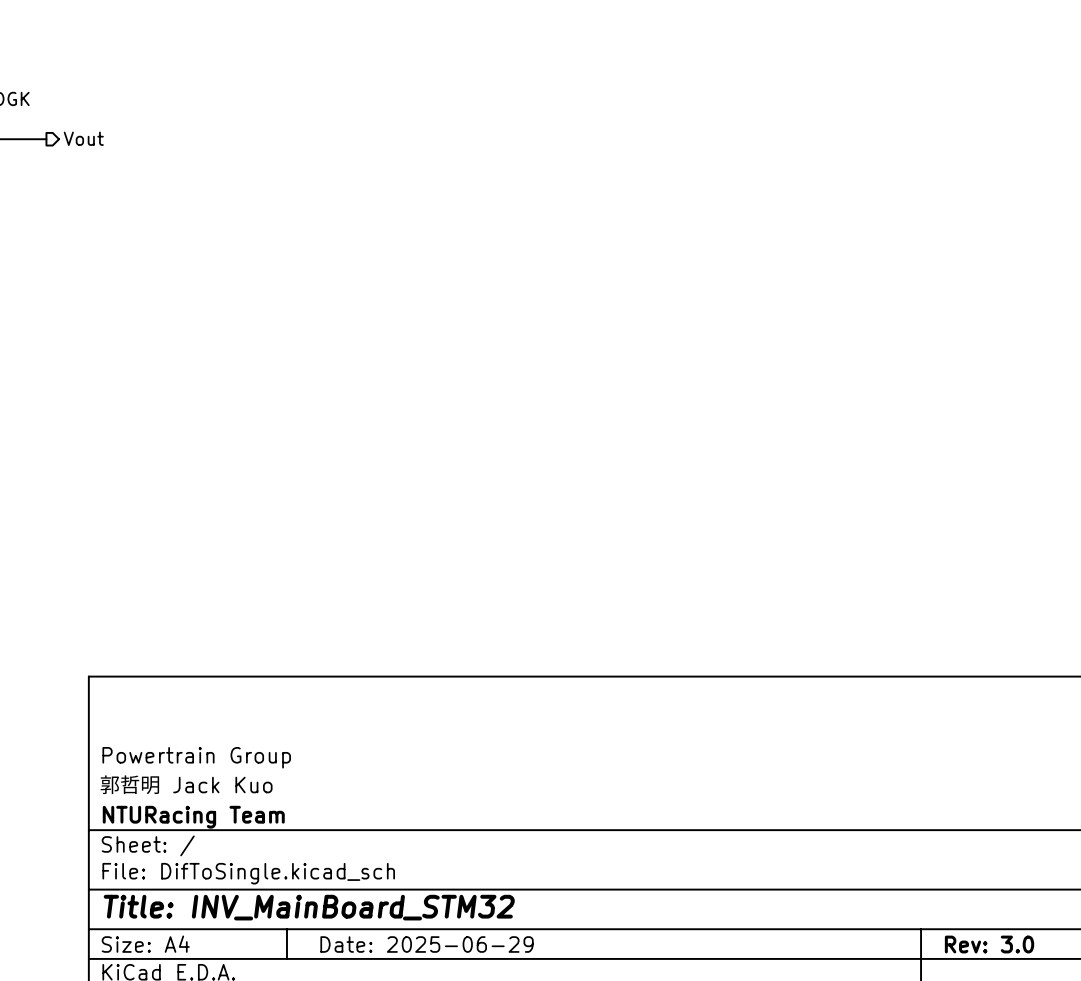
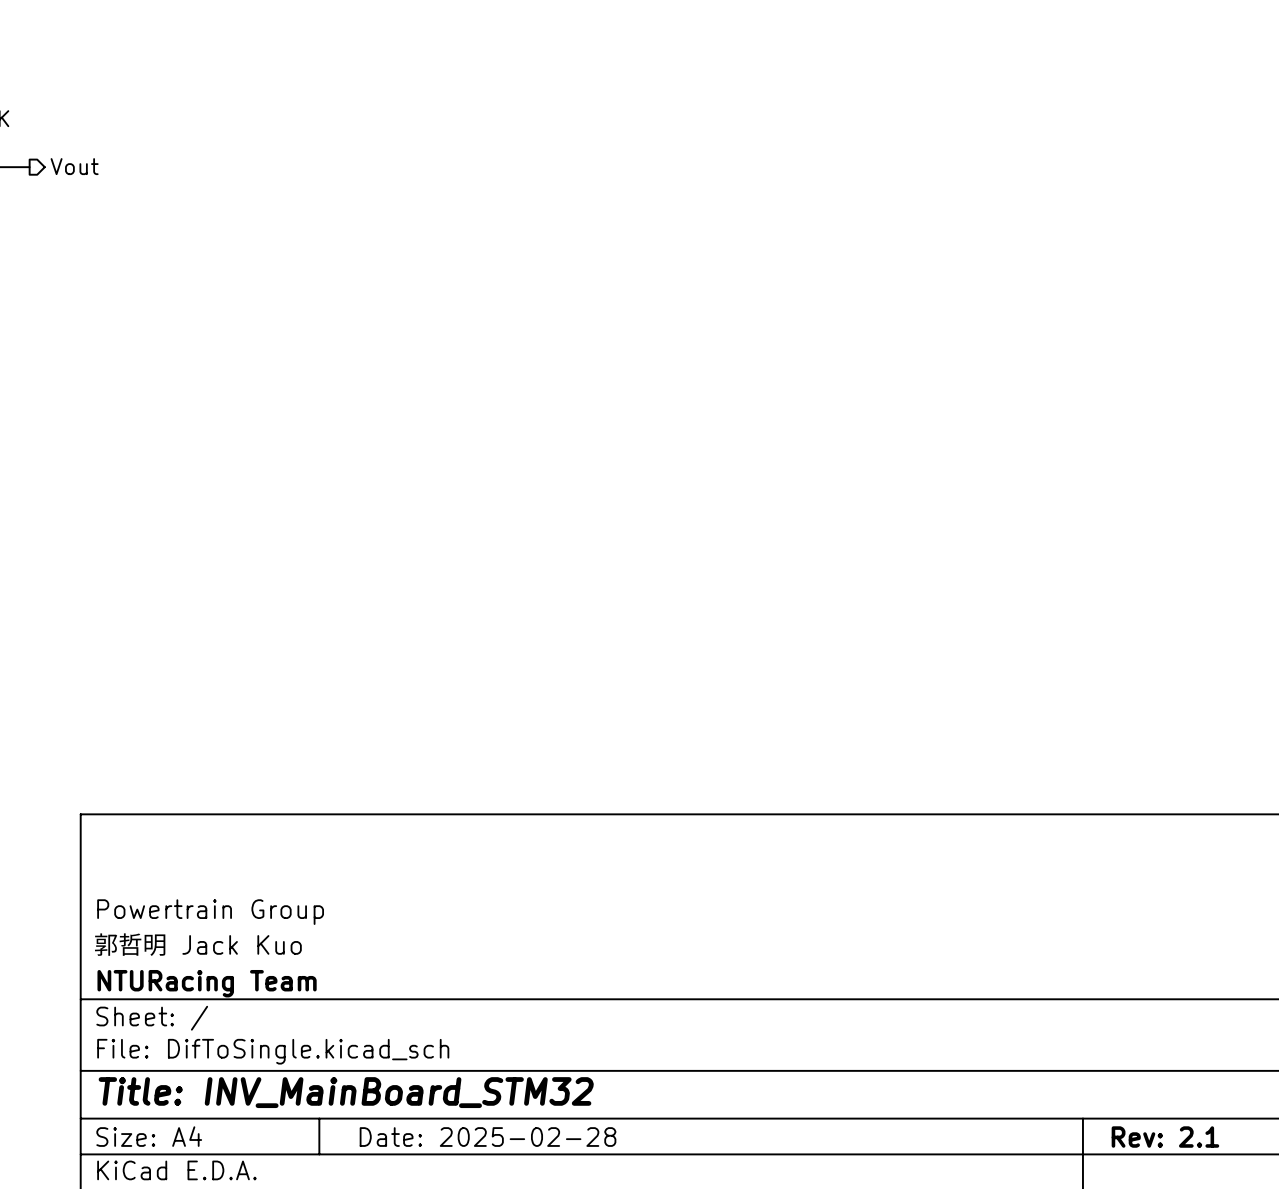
title block: Date: 2025-06-29 (427, 944) -> Date: 2025-02-28 (488, 1137)
title block: Rev: 3.0 (989, 944) -> Rev: 2.1 (1165, 1137)

